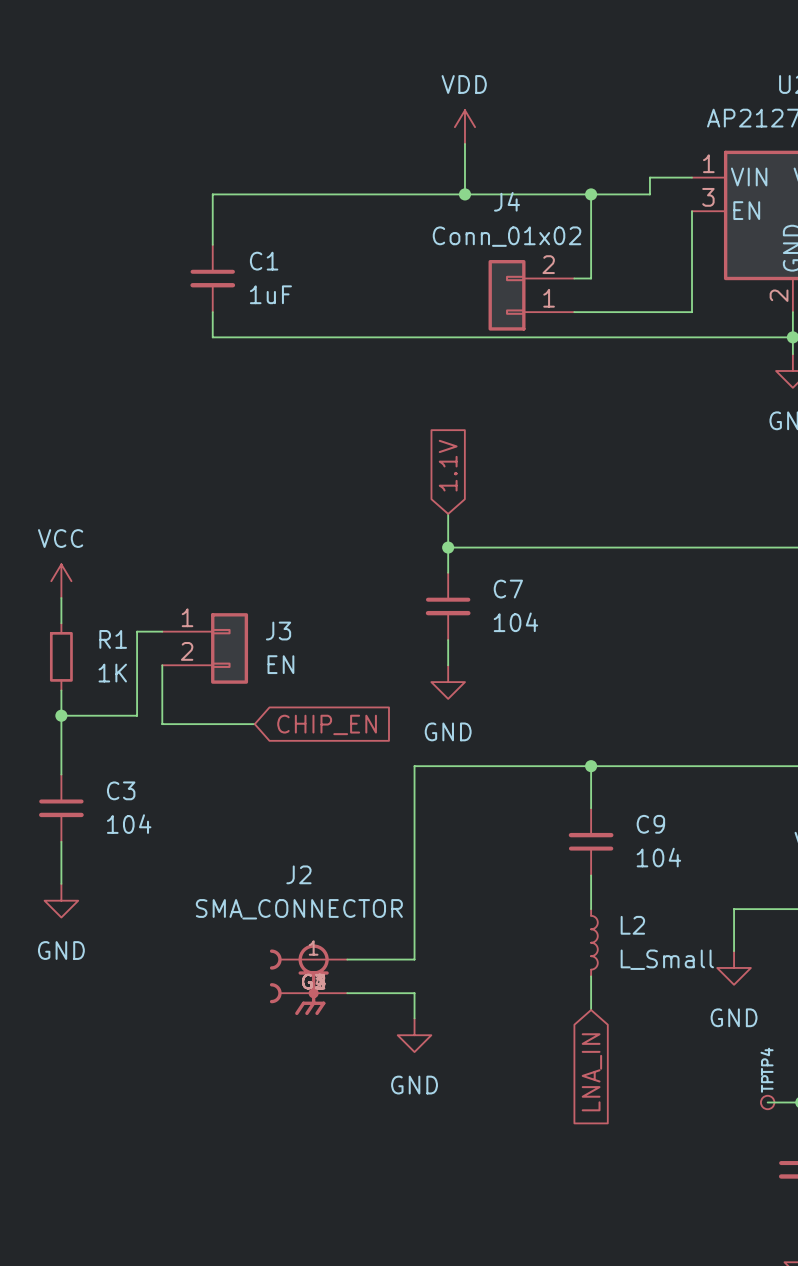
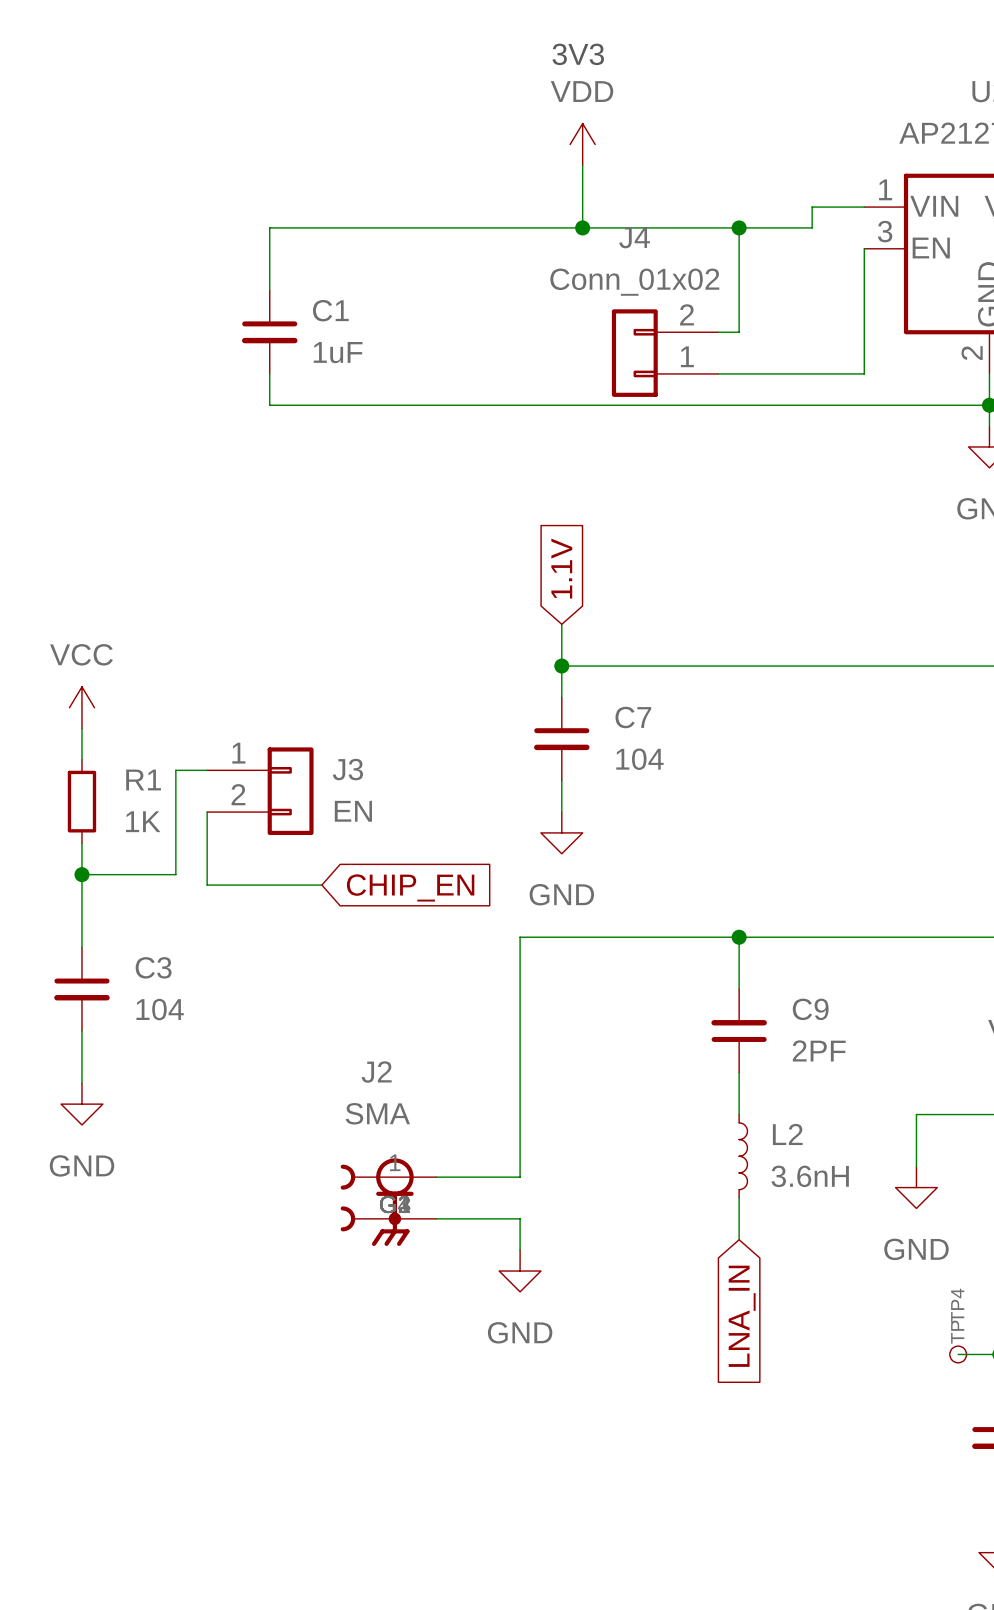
text: none -> 3V3 (578, 54)
C9 value: 104 (658, 857) -> 2PF (819, 1050)
J2 value: SMA_CONNECTOR (299, 909) -> SMA (377, 1113)
L2 value: L_Small (667, 959) -> 3.6nH (810, 1176)

